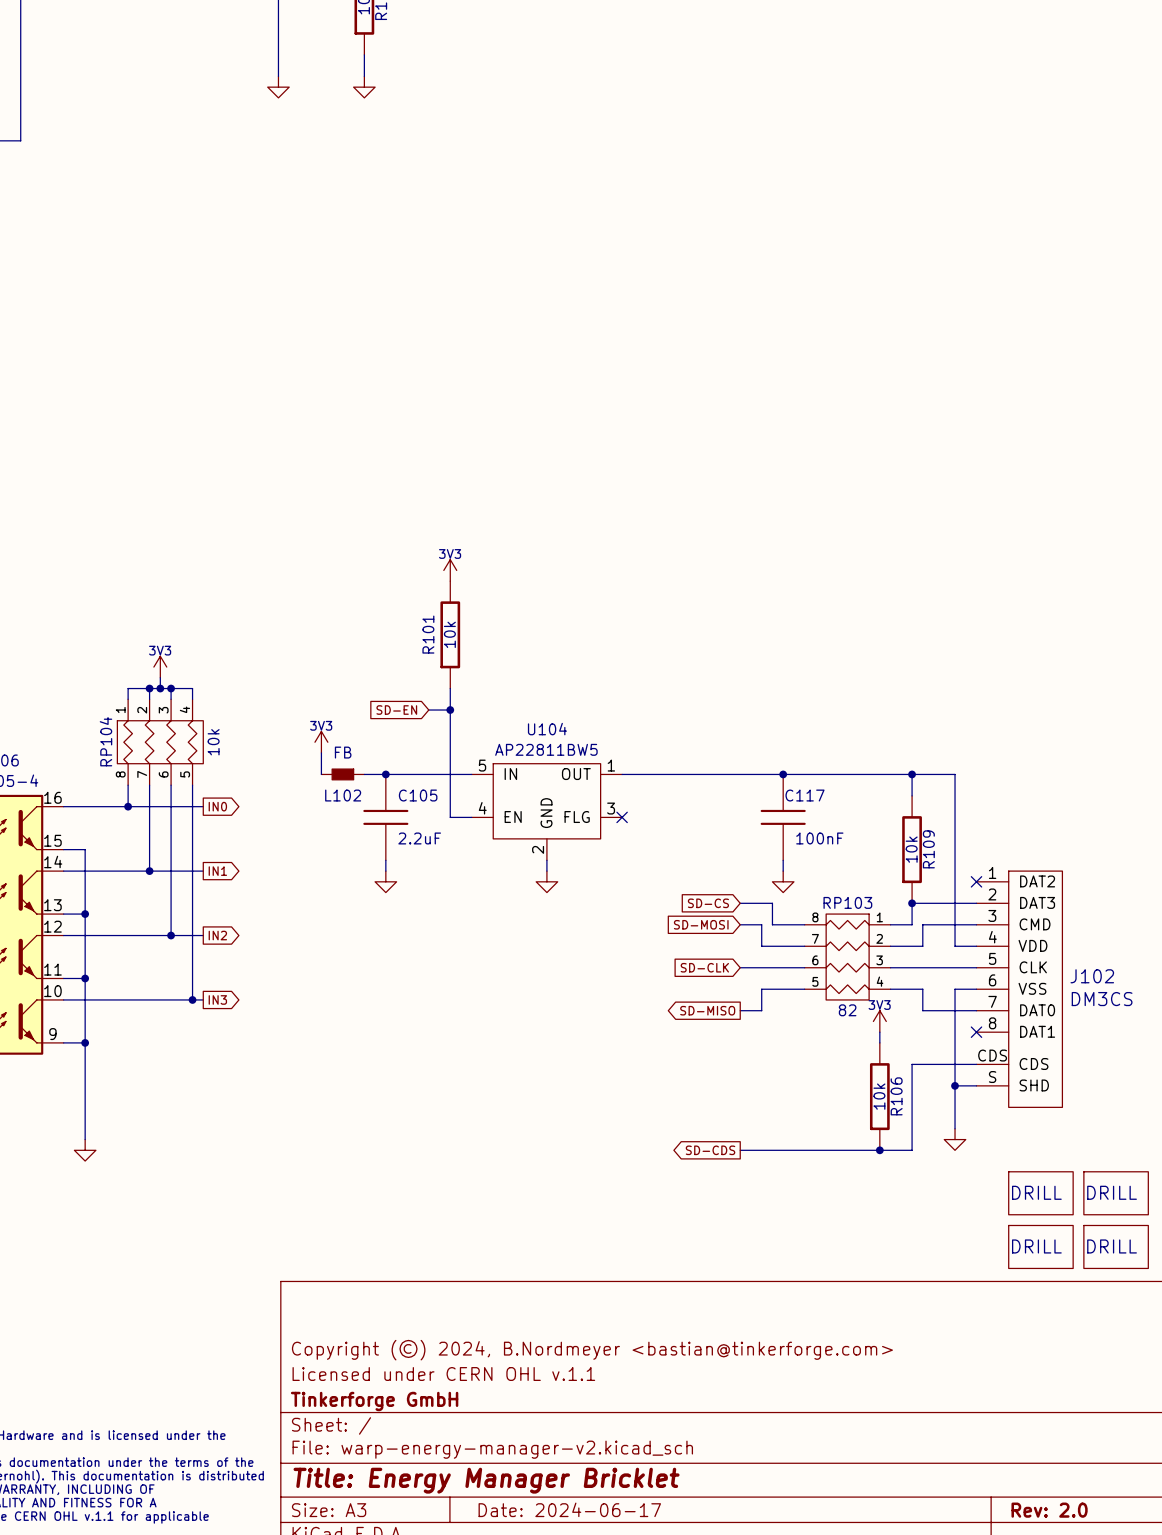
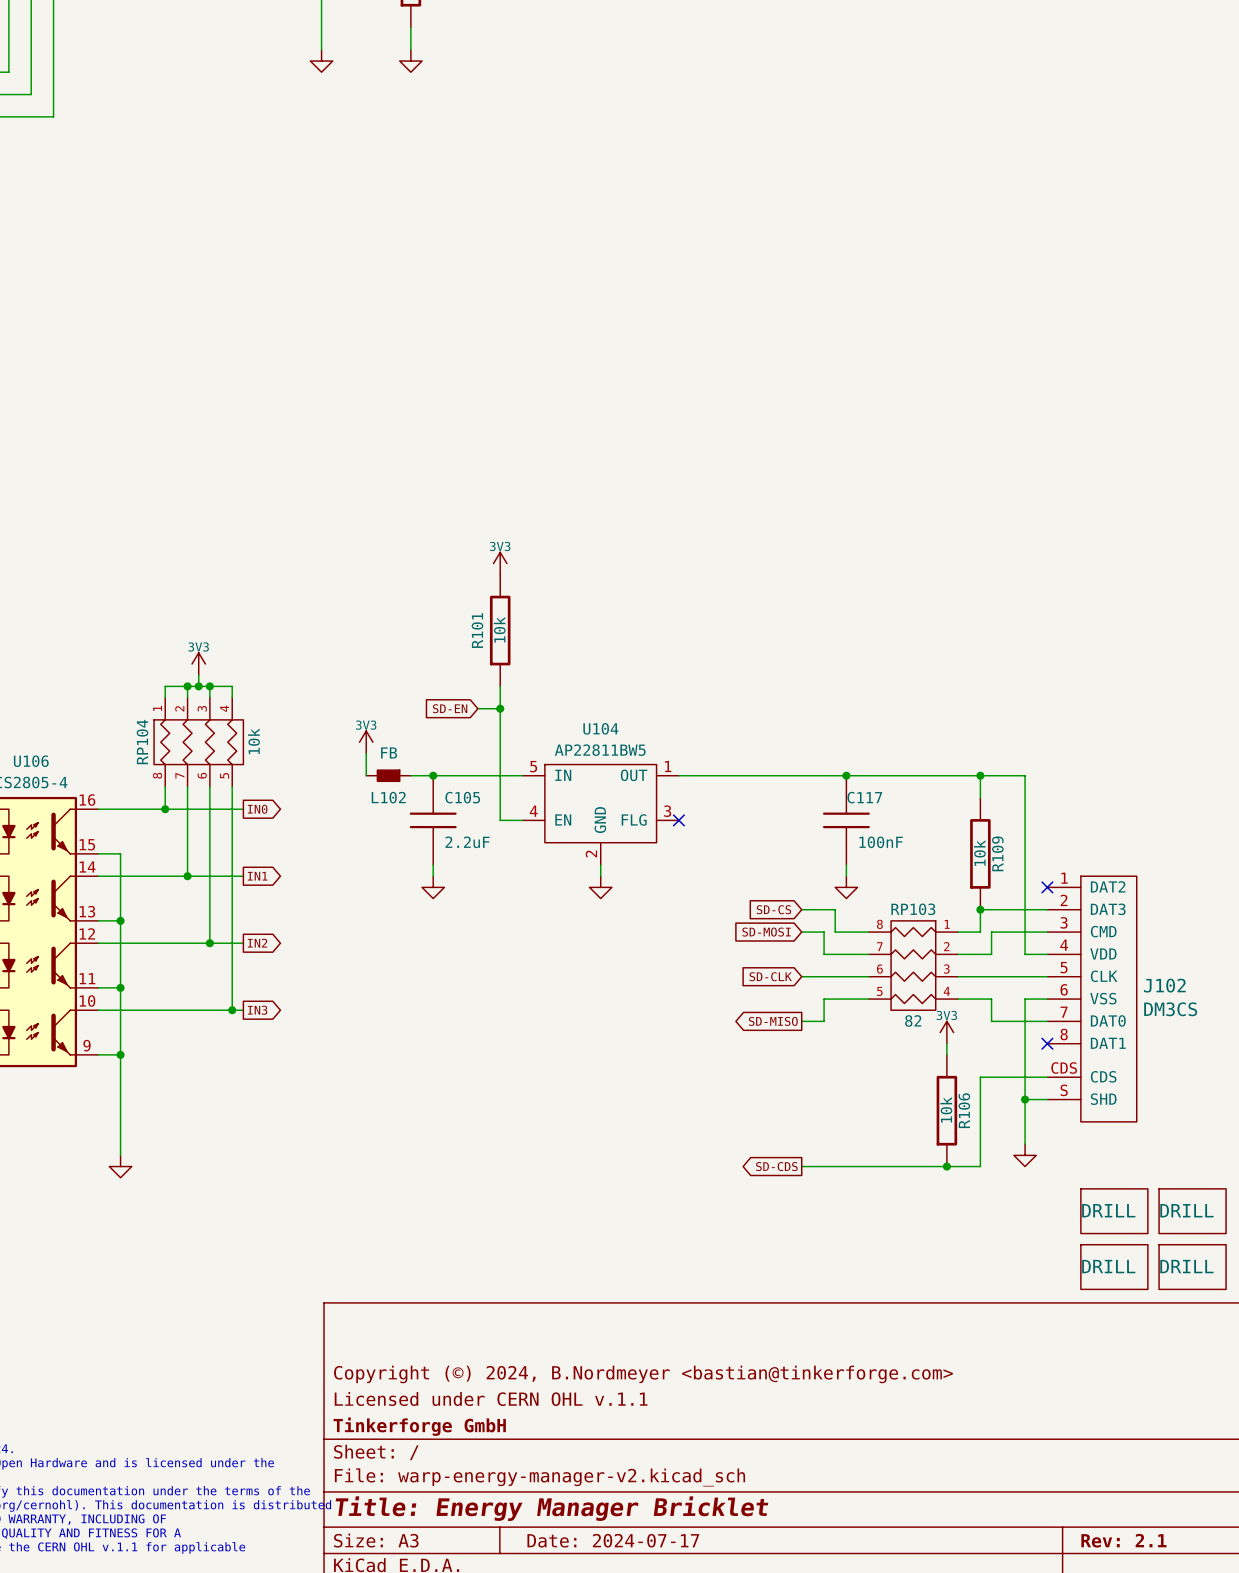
title block: Date: 2024-06-17 (569, 1509) -> Date: 2024-07-17 (613, 1540)
title block: Rev: 2.0 (1049, 1510) -> Rev: 2.1 (1123, 1540)

